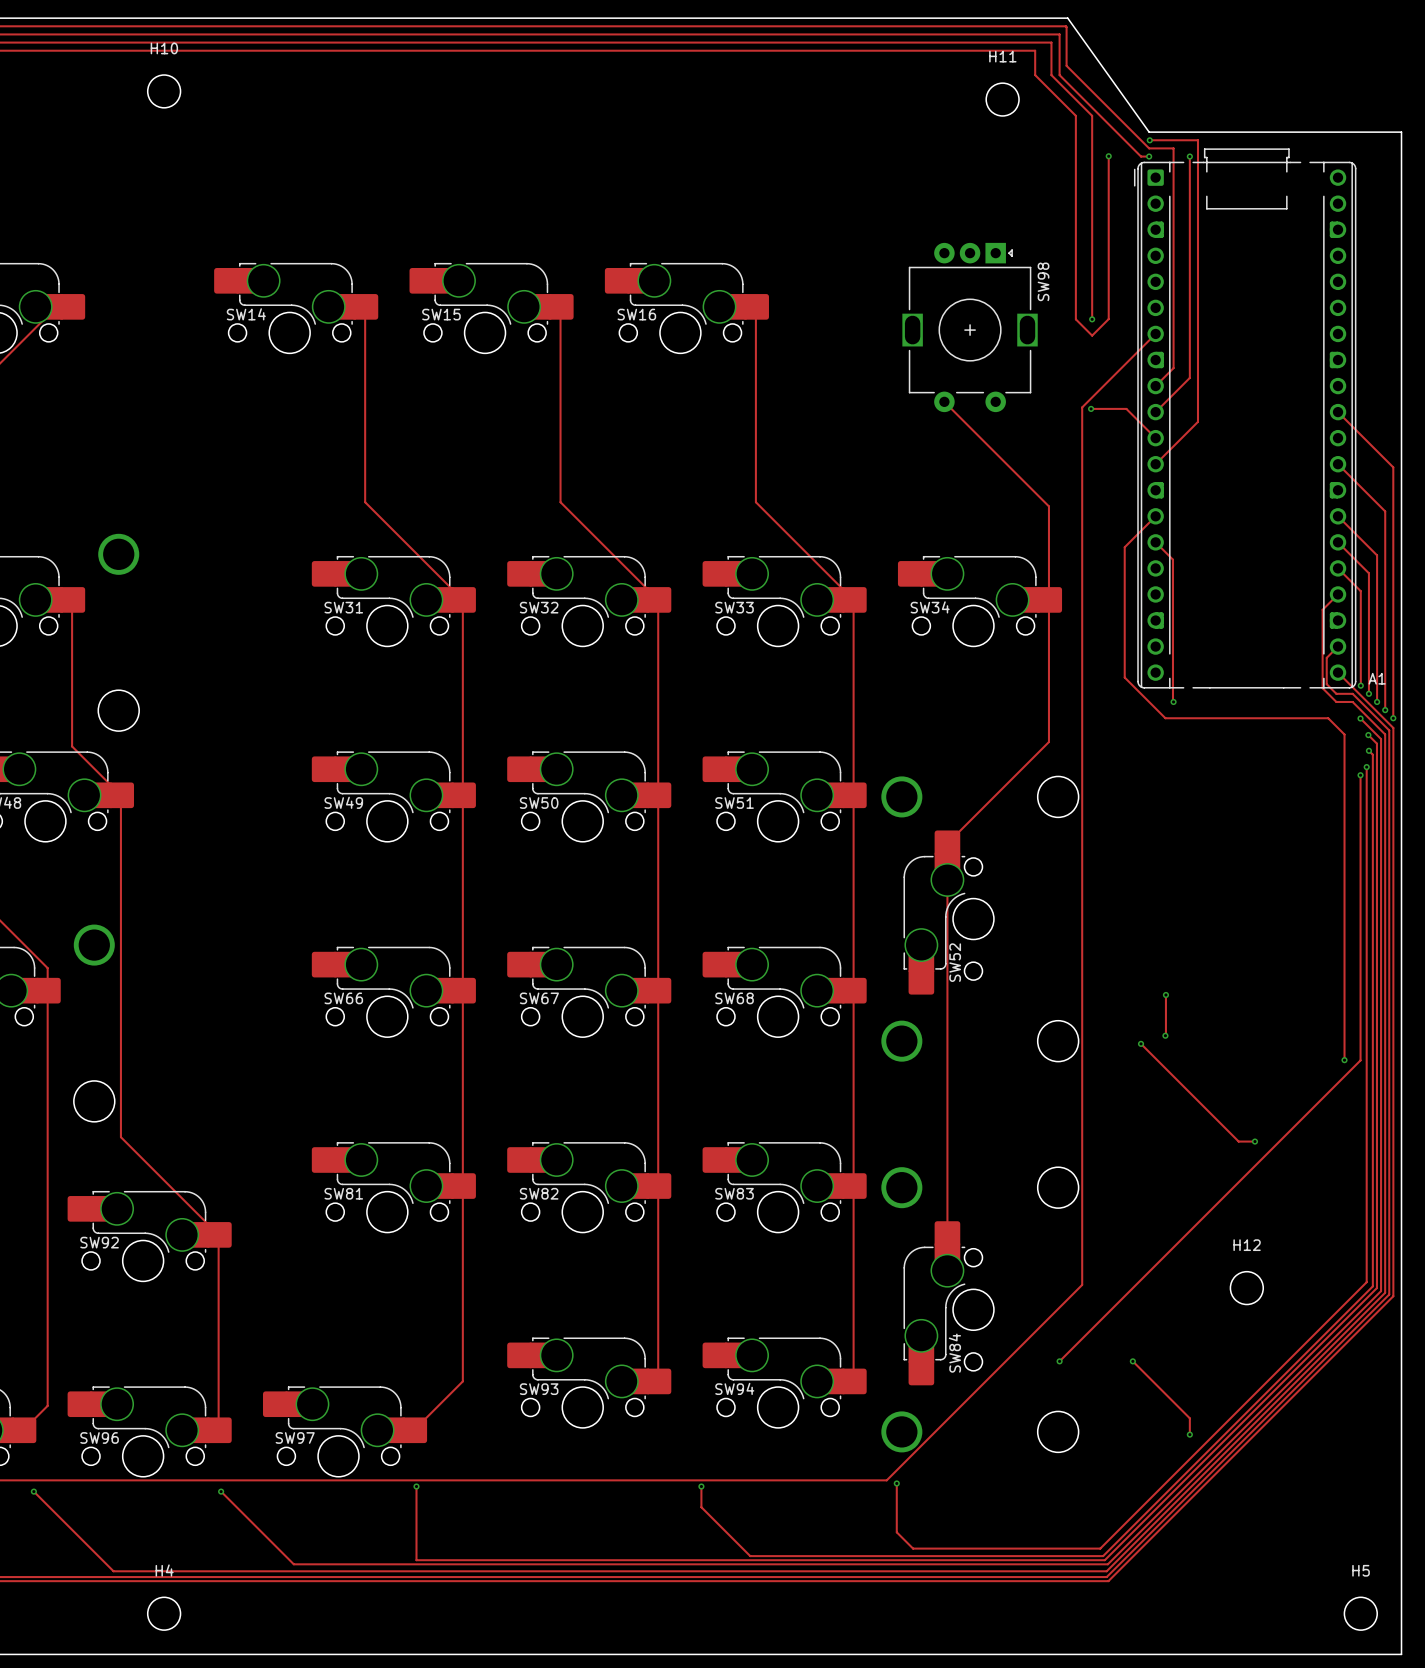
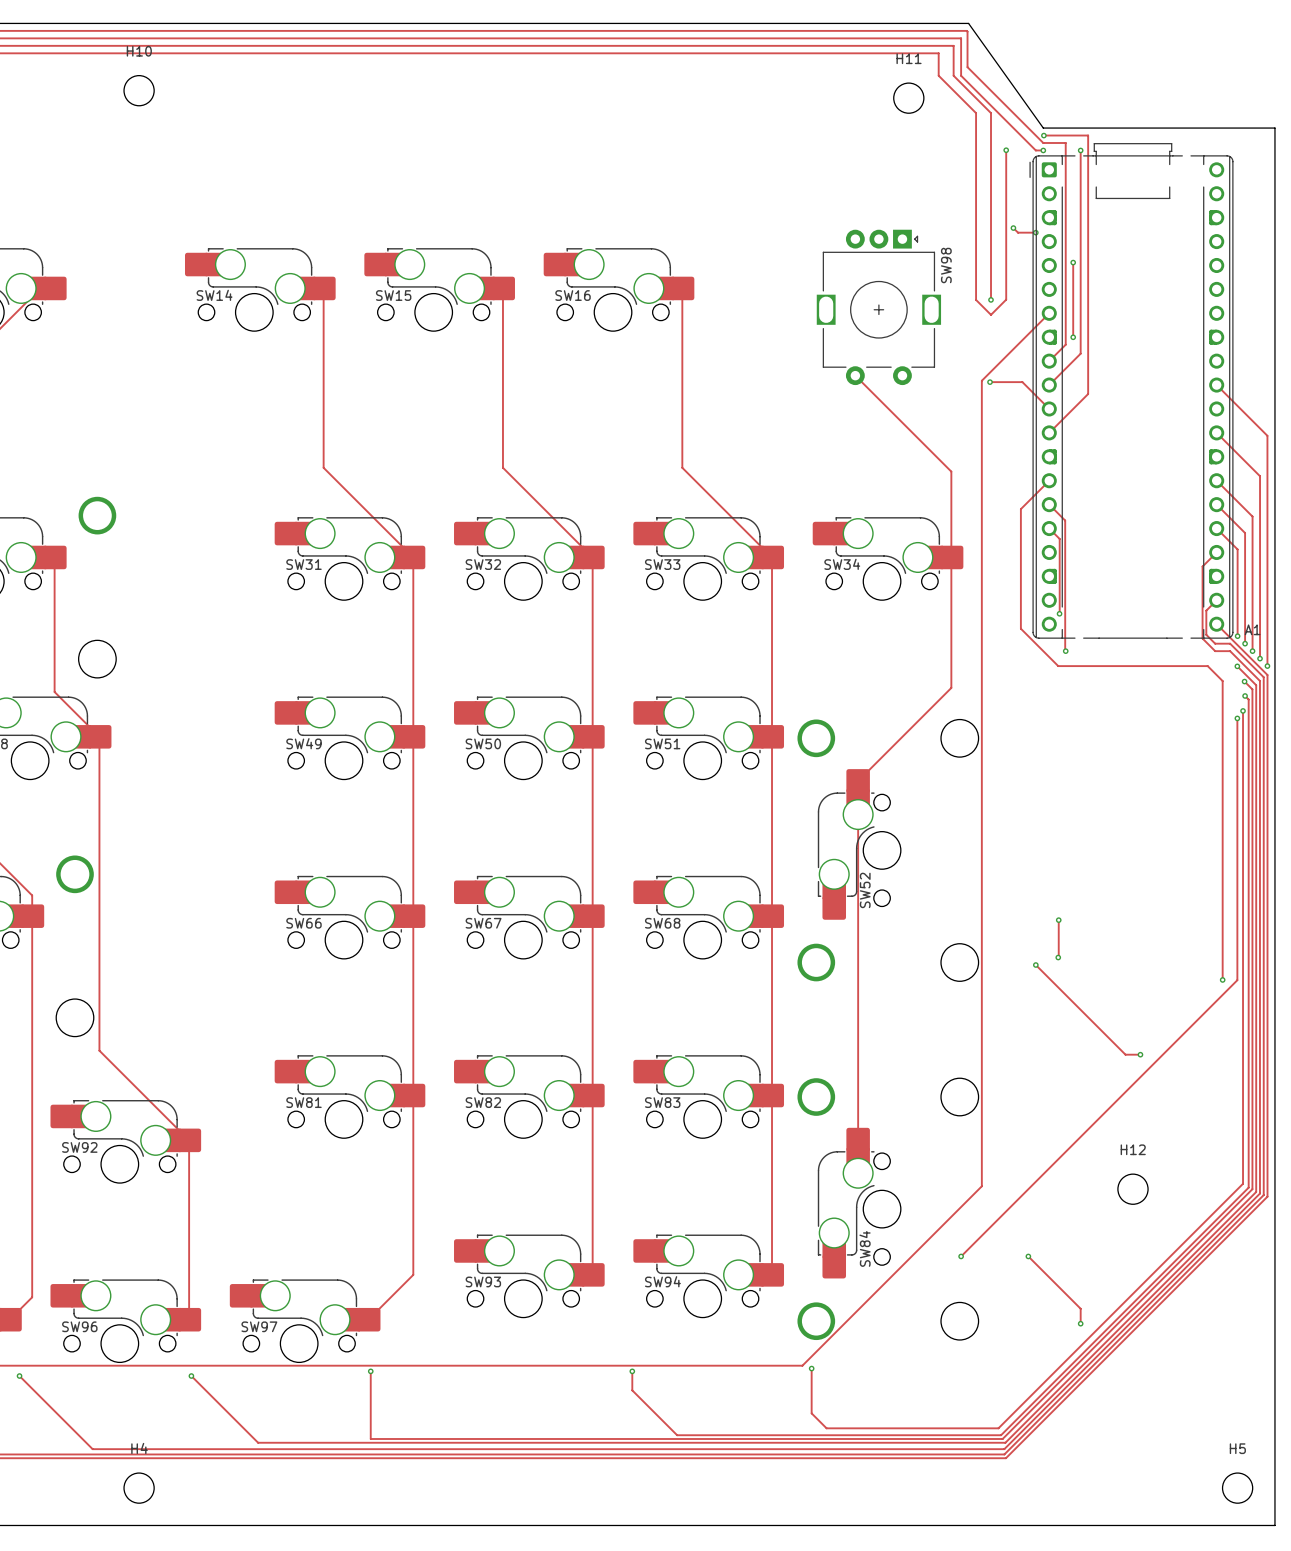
track: none -> (1013, 228) (1018, 232) (1035, 232)
via: none -> (1013, 228)
via: none -> (1035, 232)
track: none -> (1073, 262) (1073, 337)
via: none -> (1073, 262)
via: none -> (1073, 337)
track: none -> (1049, 528) (1059, 538) (1058, 613)
via: none -> (1059, 613)

